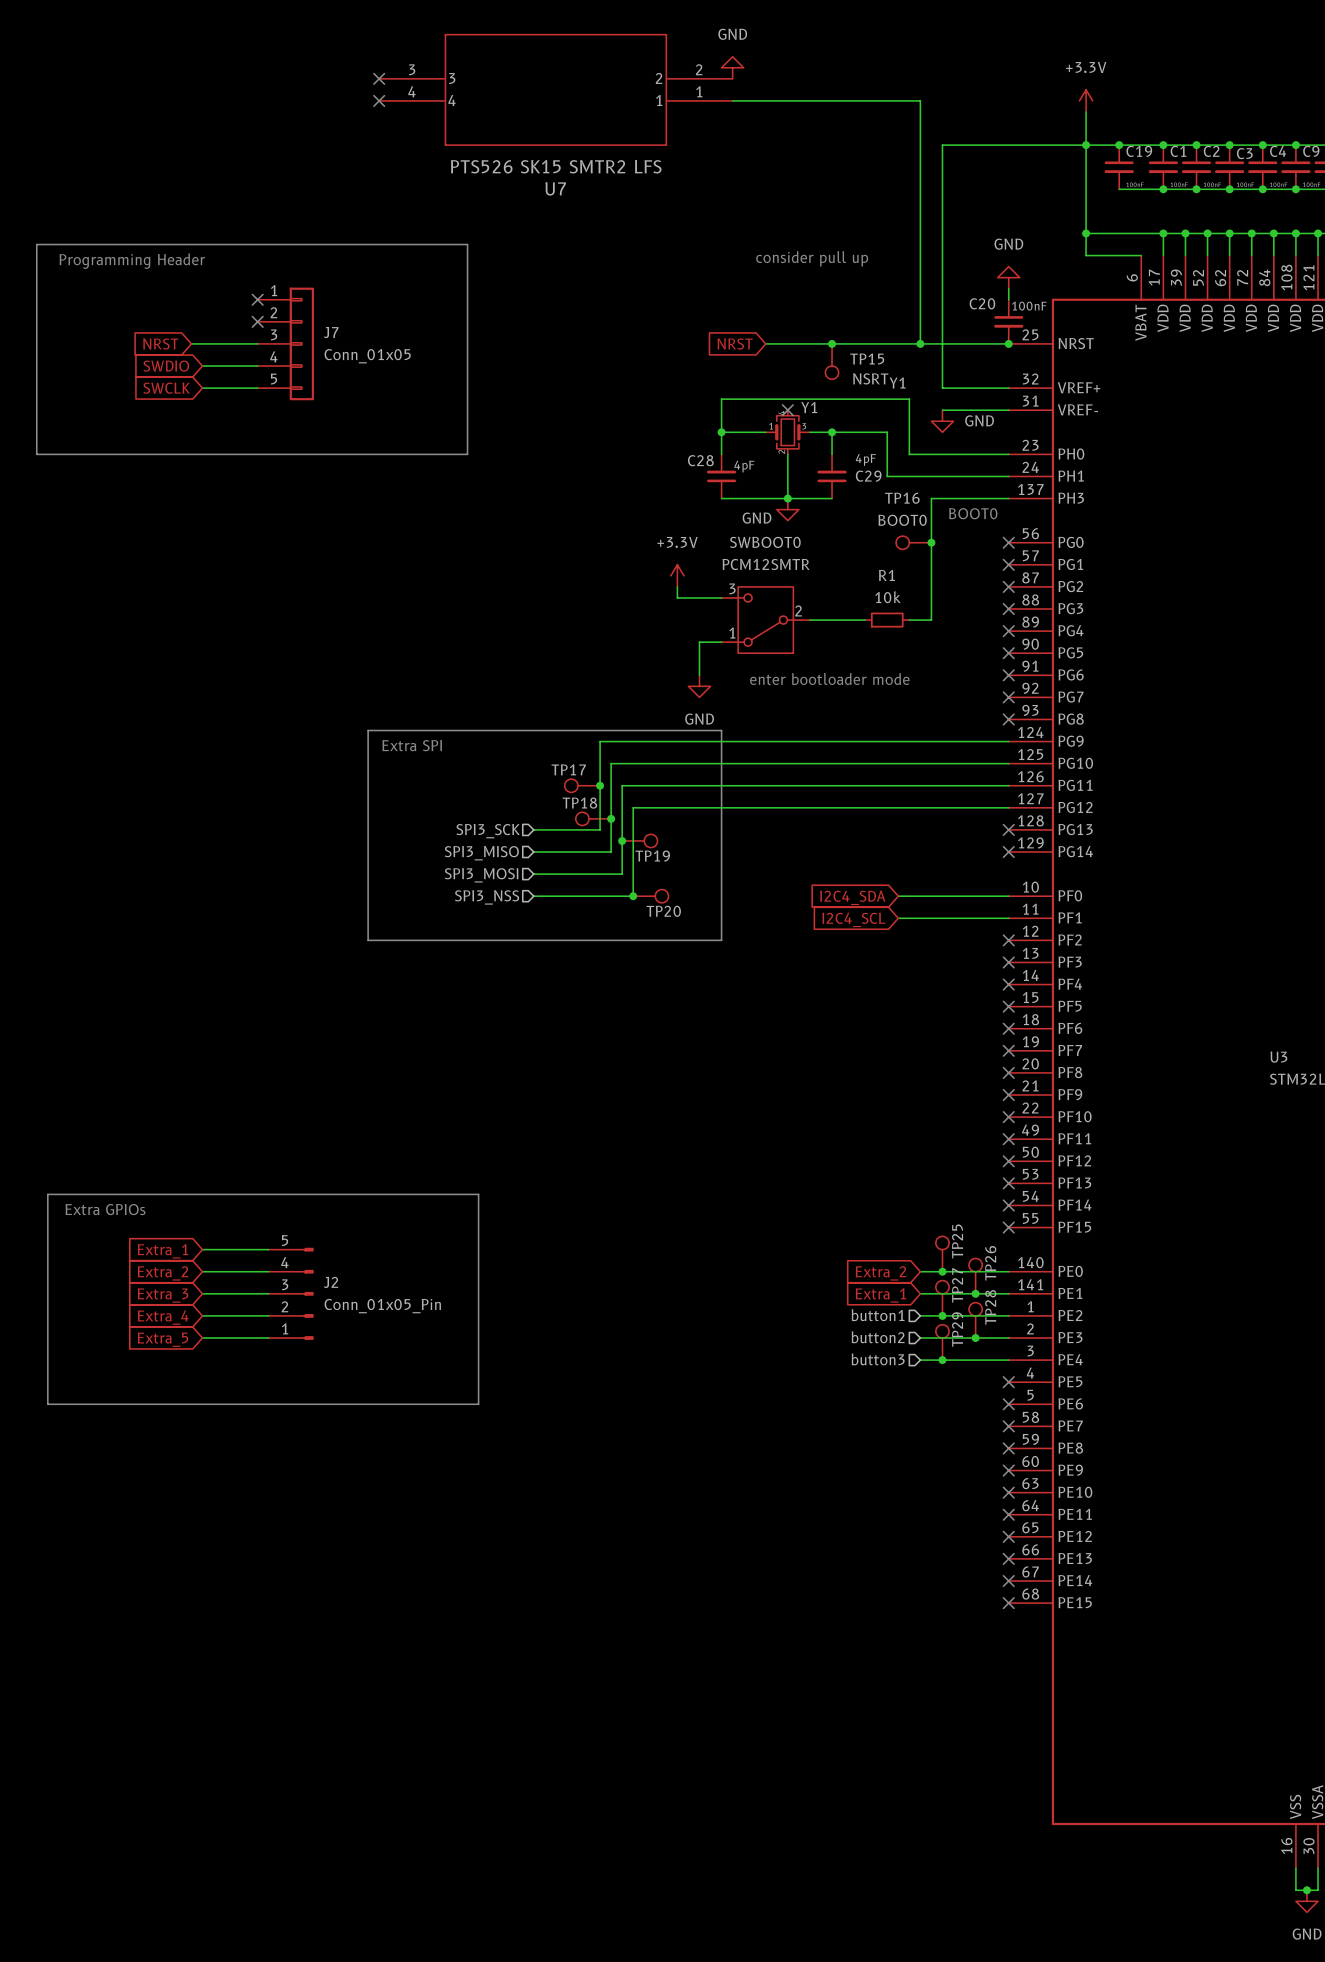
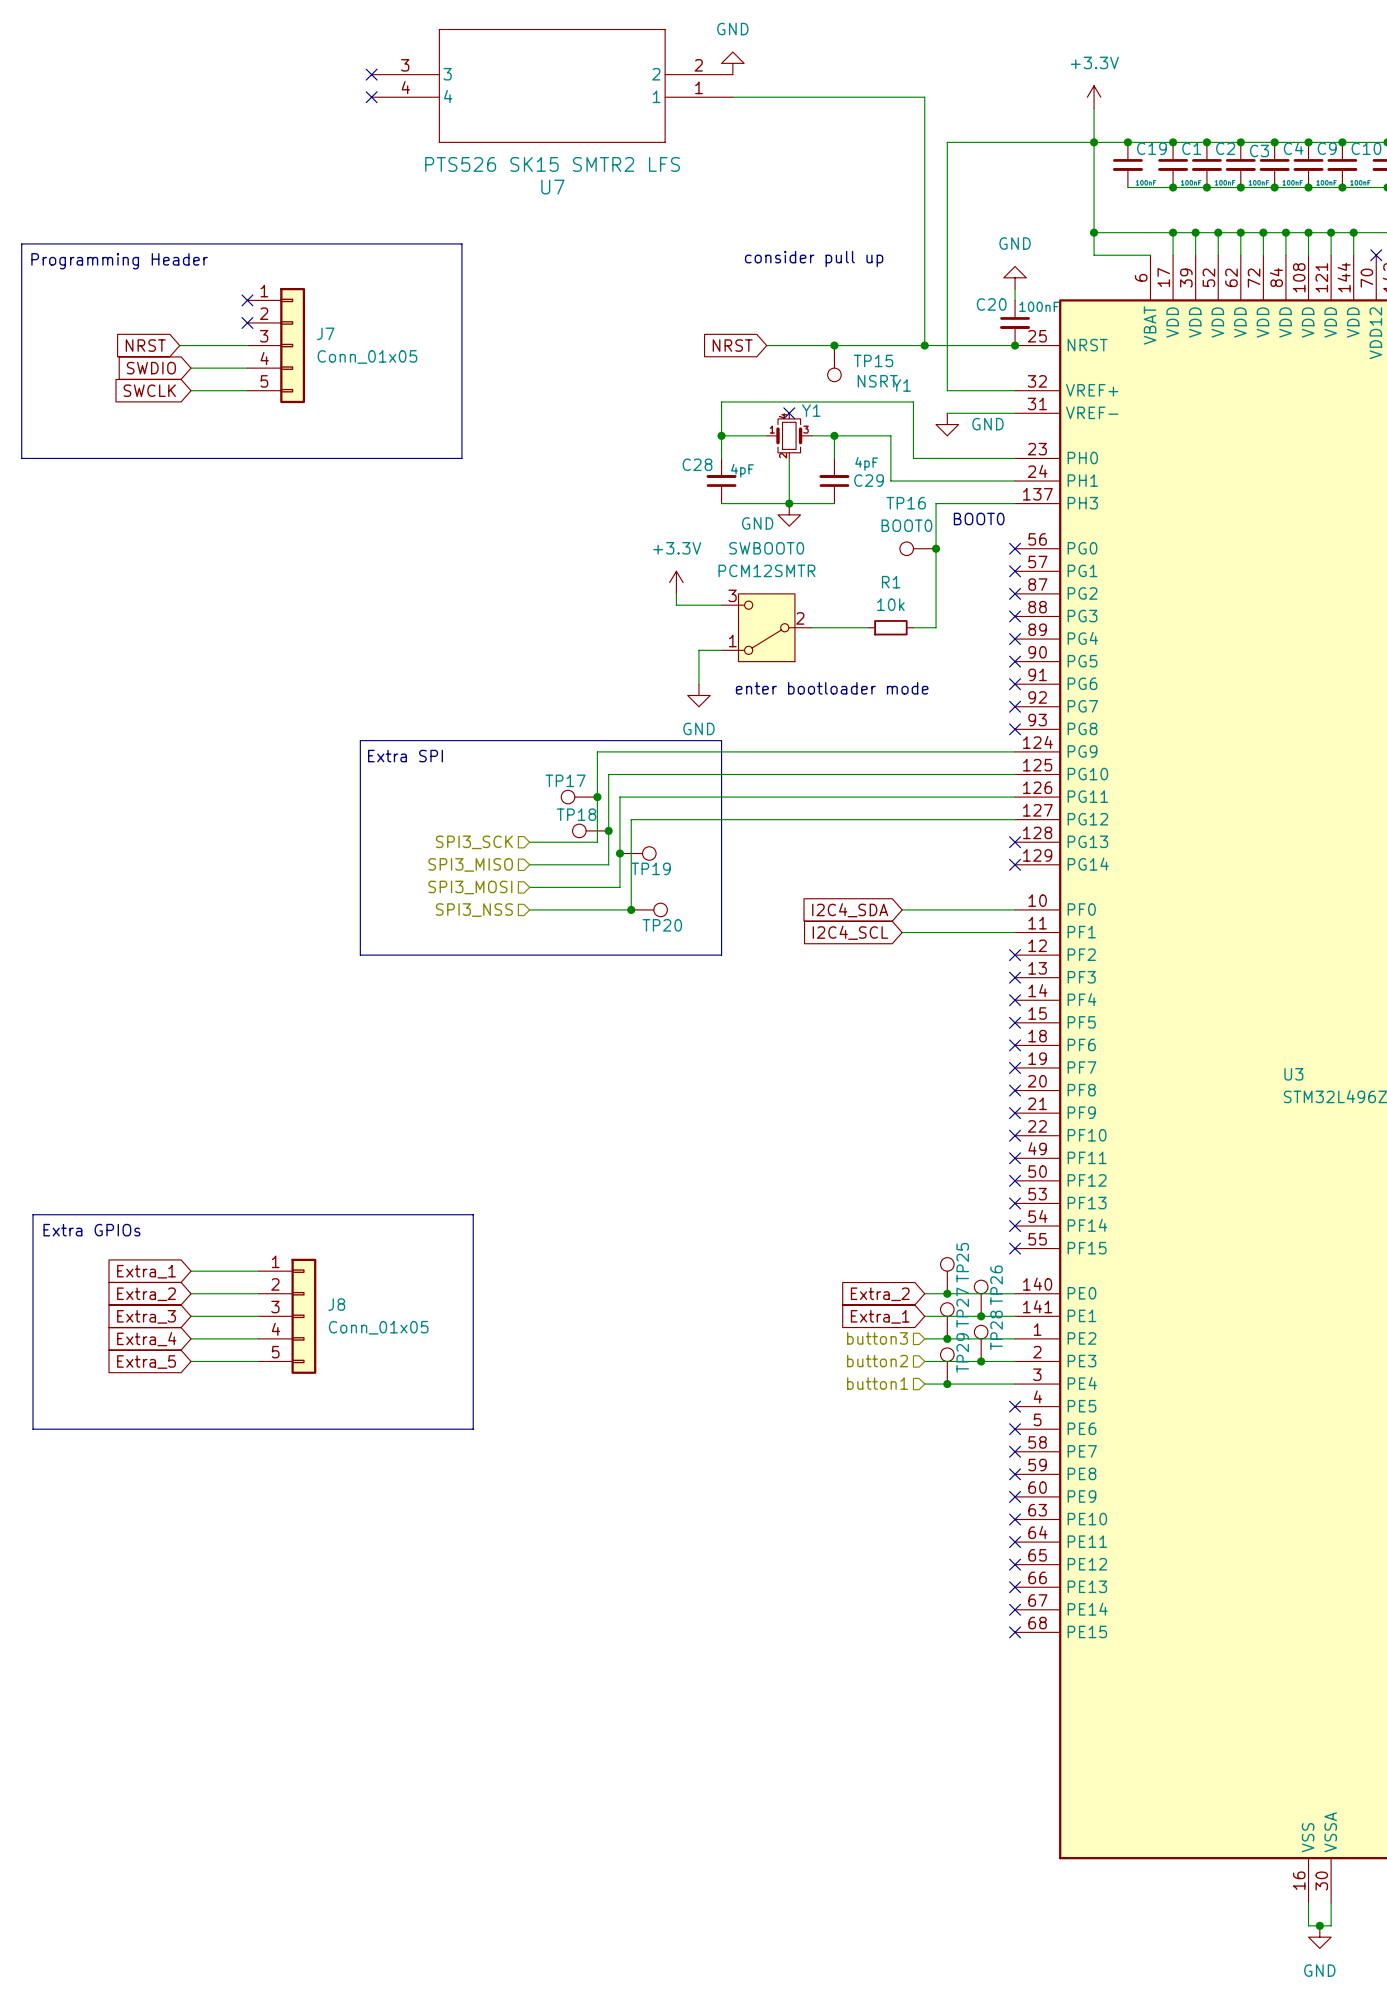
J2: Conn_01x05_Pin (291, 1293) -> none
J8: none -> Conn_01x05 (287, 1316)
hierarchical label: button1 (878, 1315) -> button3 (877, 1338)
hierarchical label: button3 (878, 1359) -> button1 (877, 1383)

